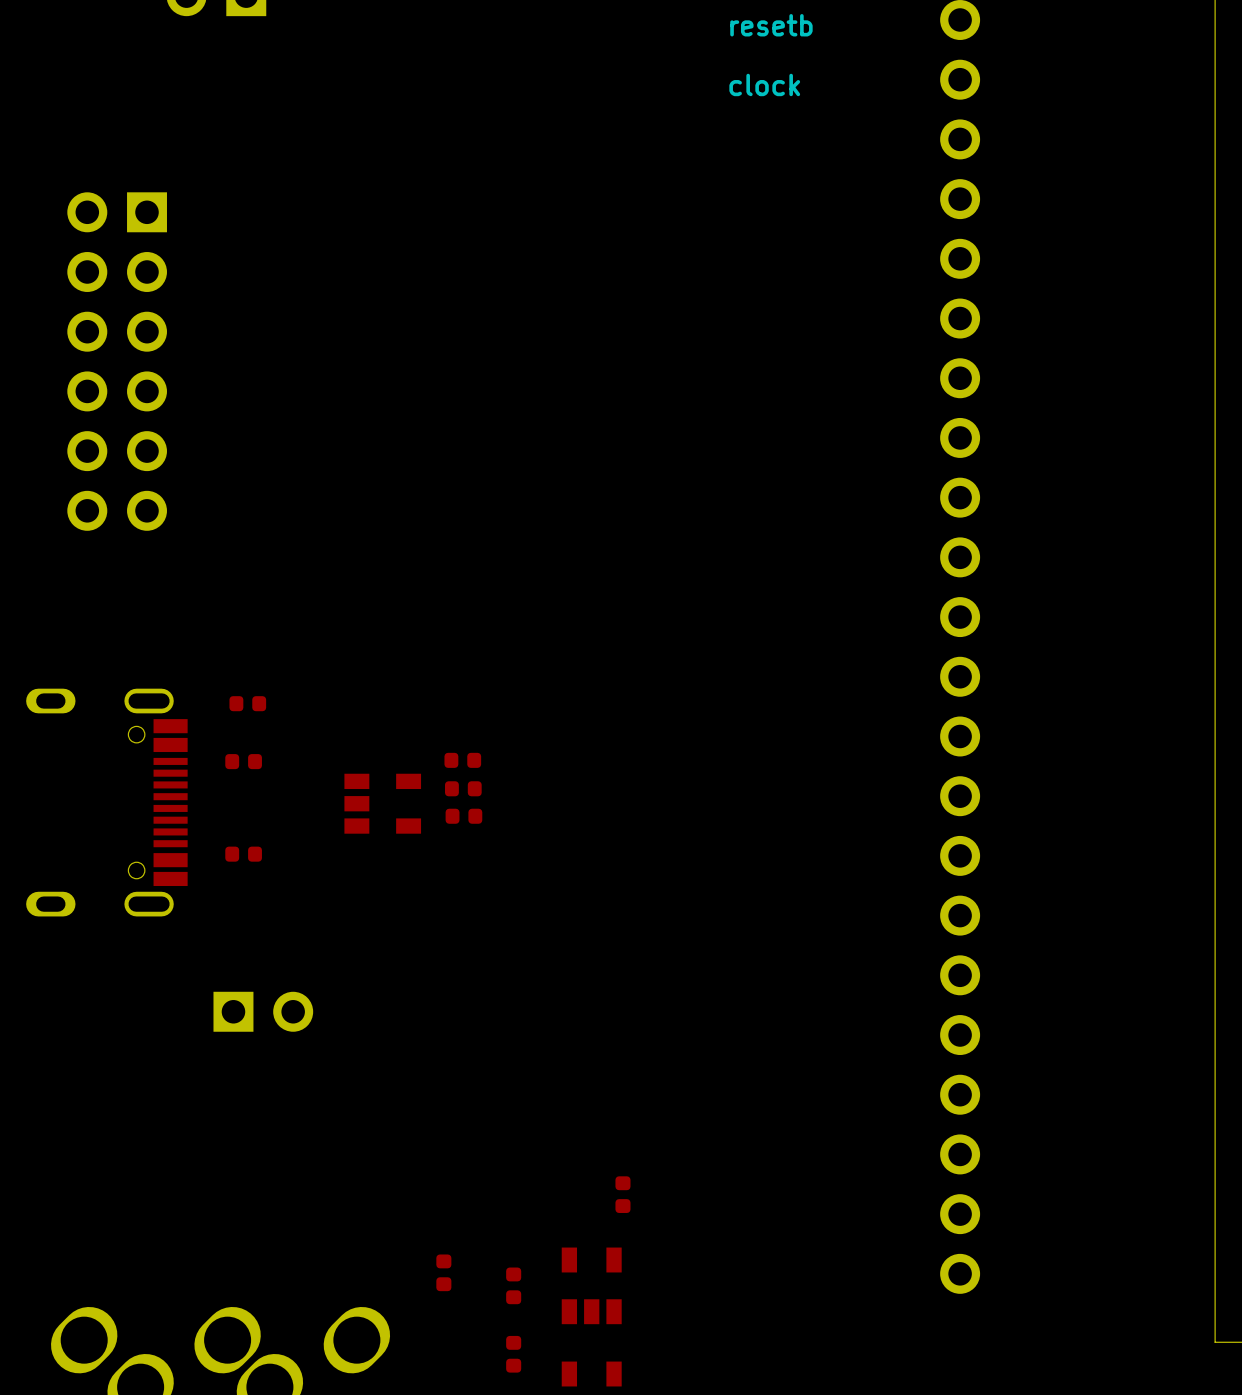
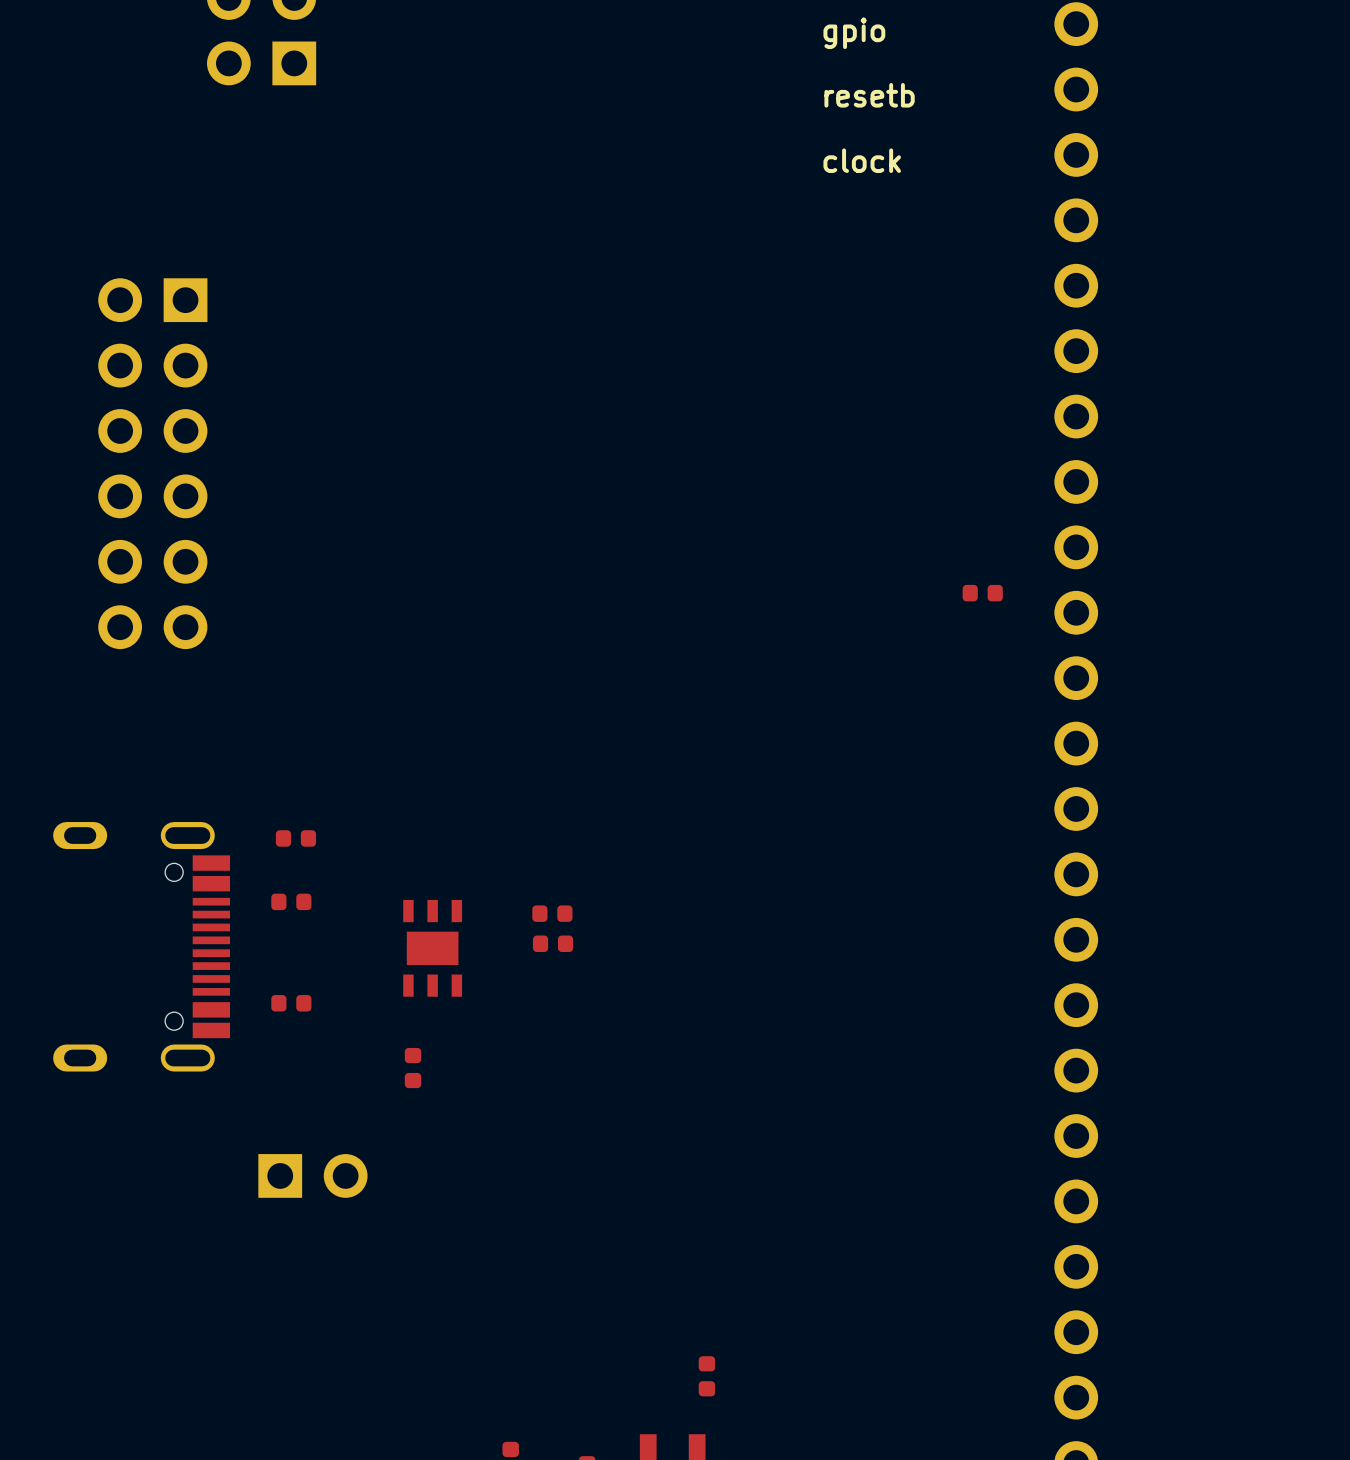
part: none -> (982, 593)
part: (462, 760) -> none
part: none -> (552, 913)
part footprint: [344, 773, 422, 834] -> [403, 899, 463, 997]
part: (463, 788) -> none
part: none -> (553, 943)
part: (463, 816) -> none
part: none -> (413, 1068)

